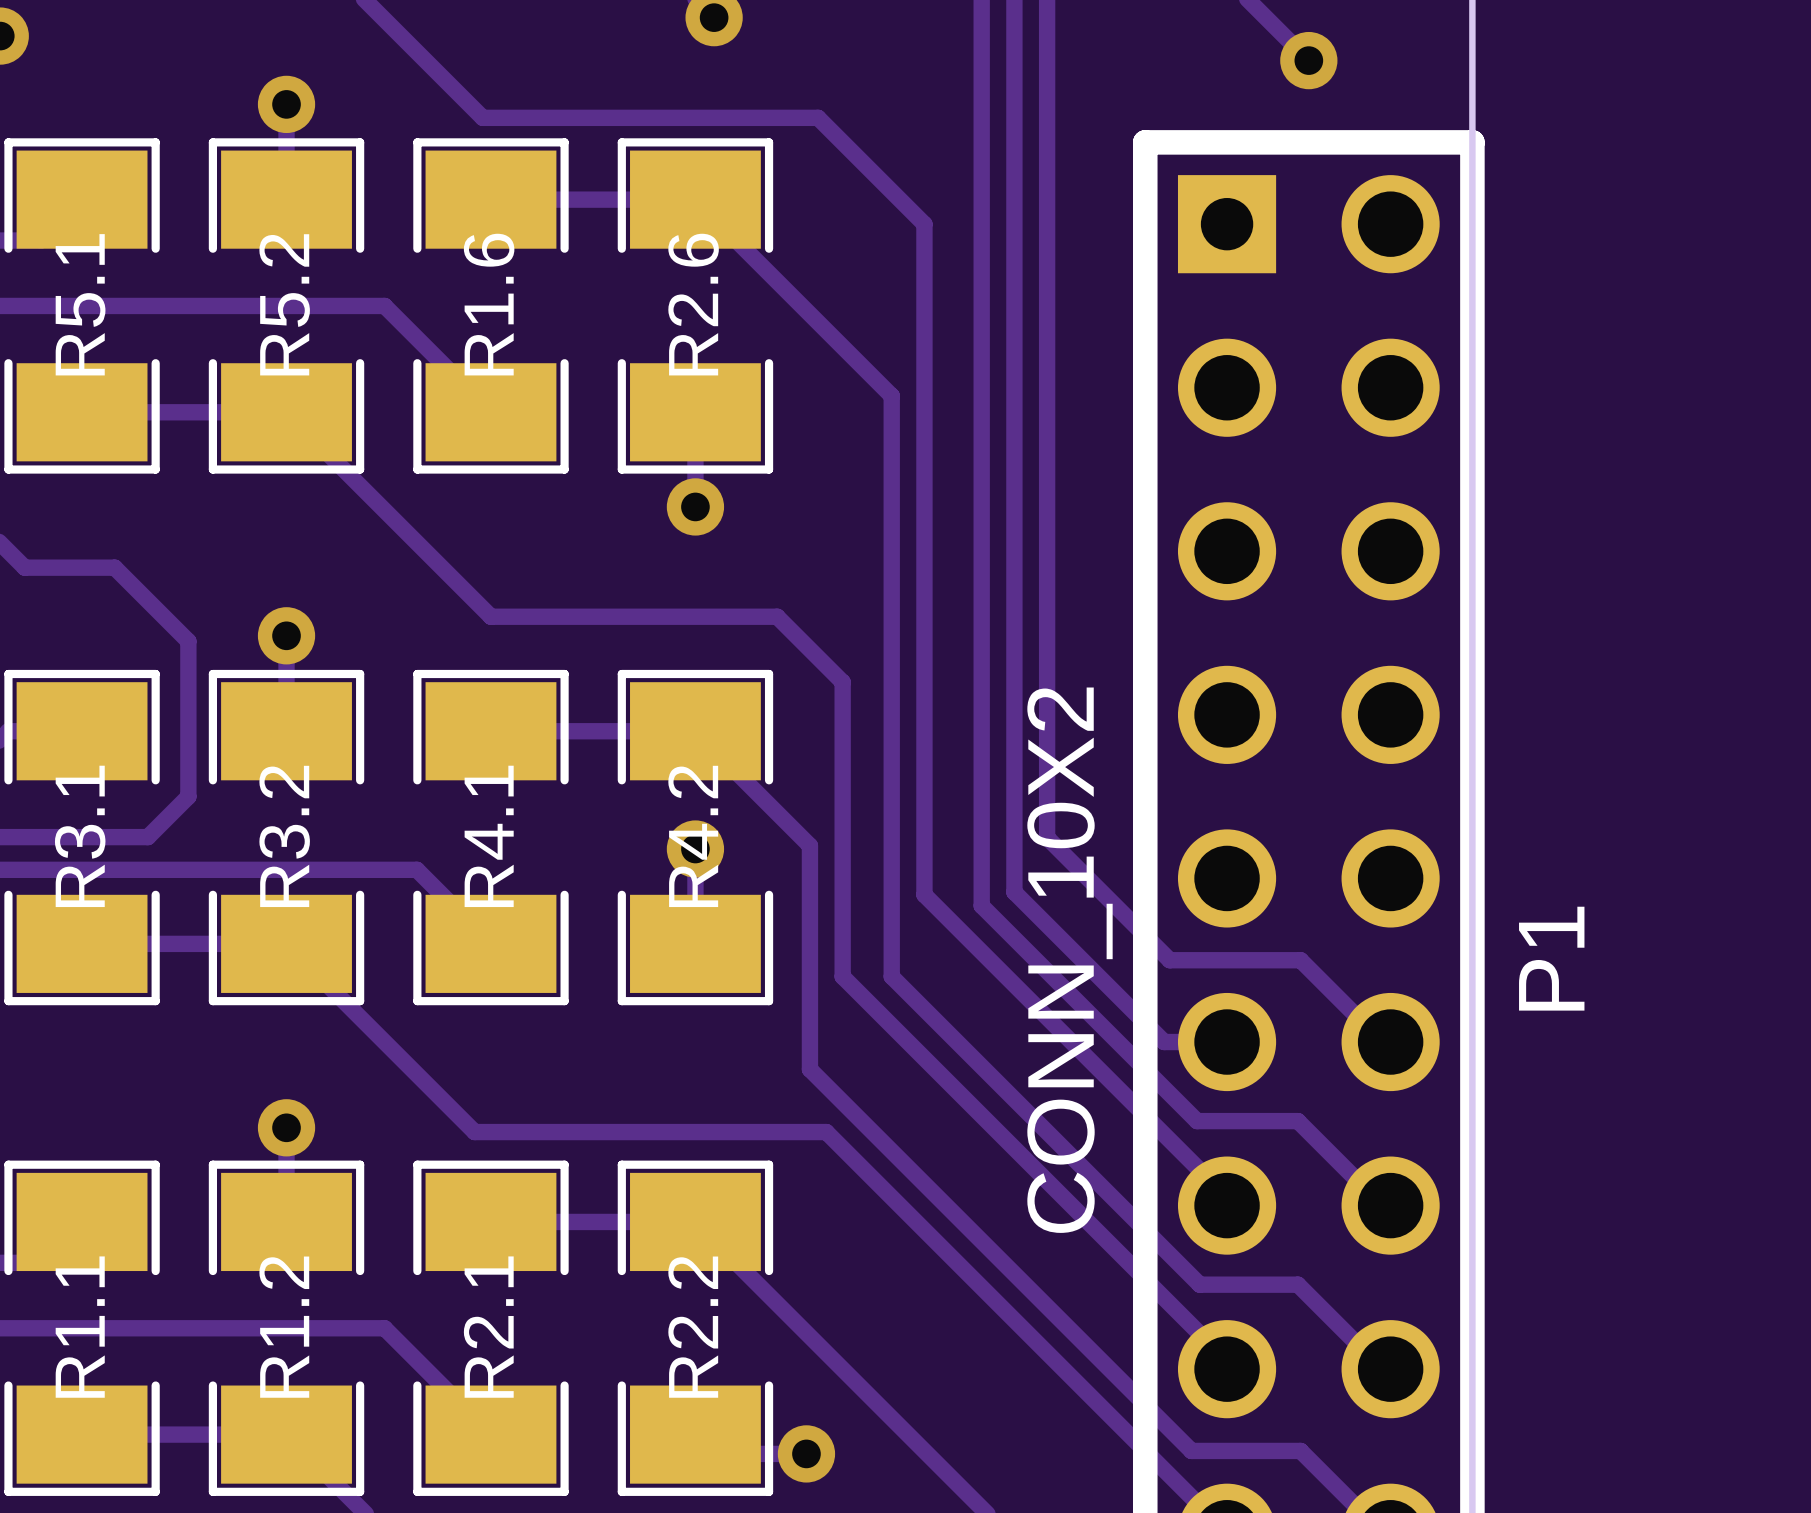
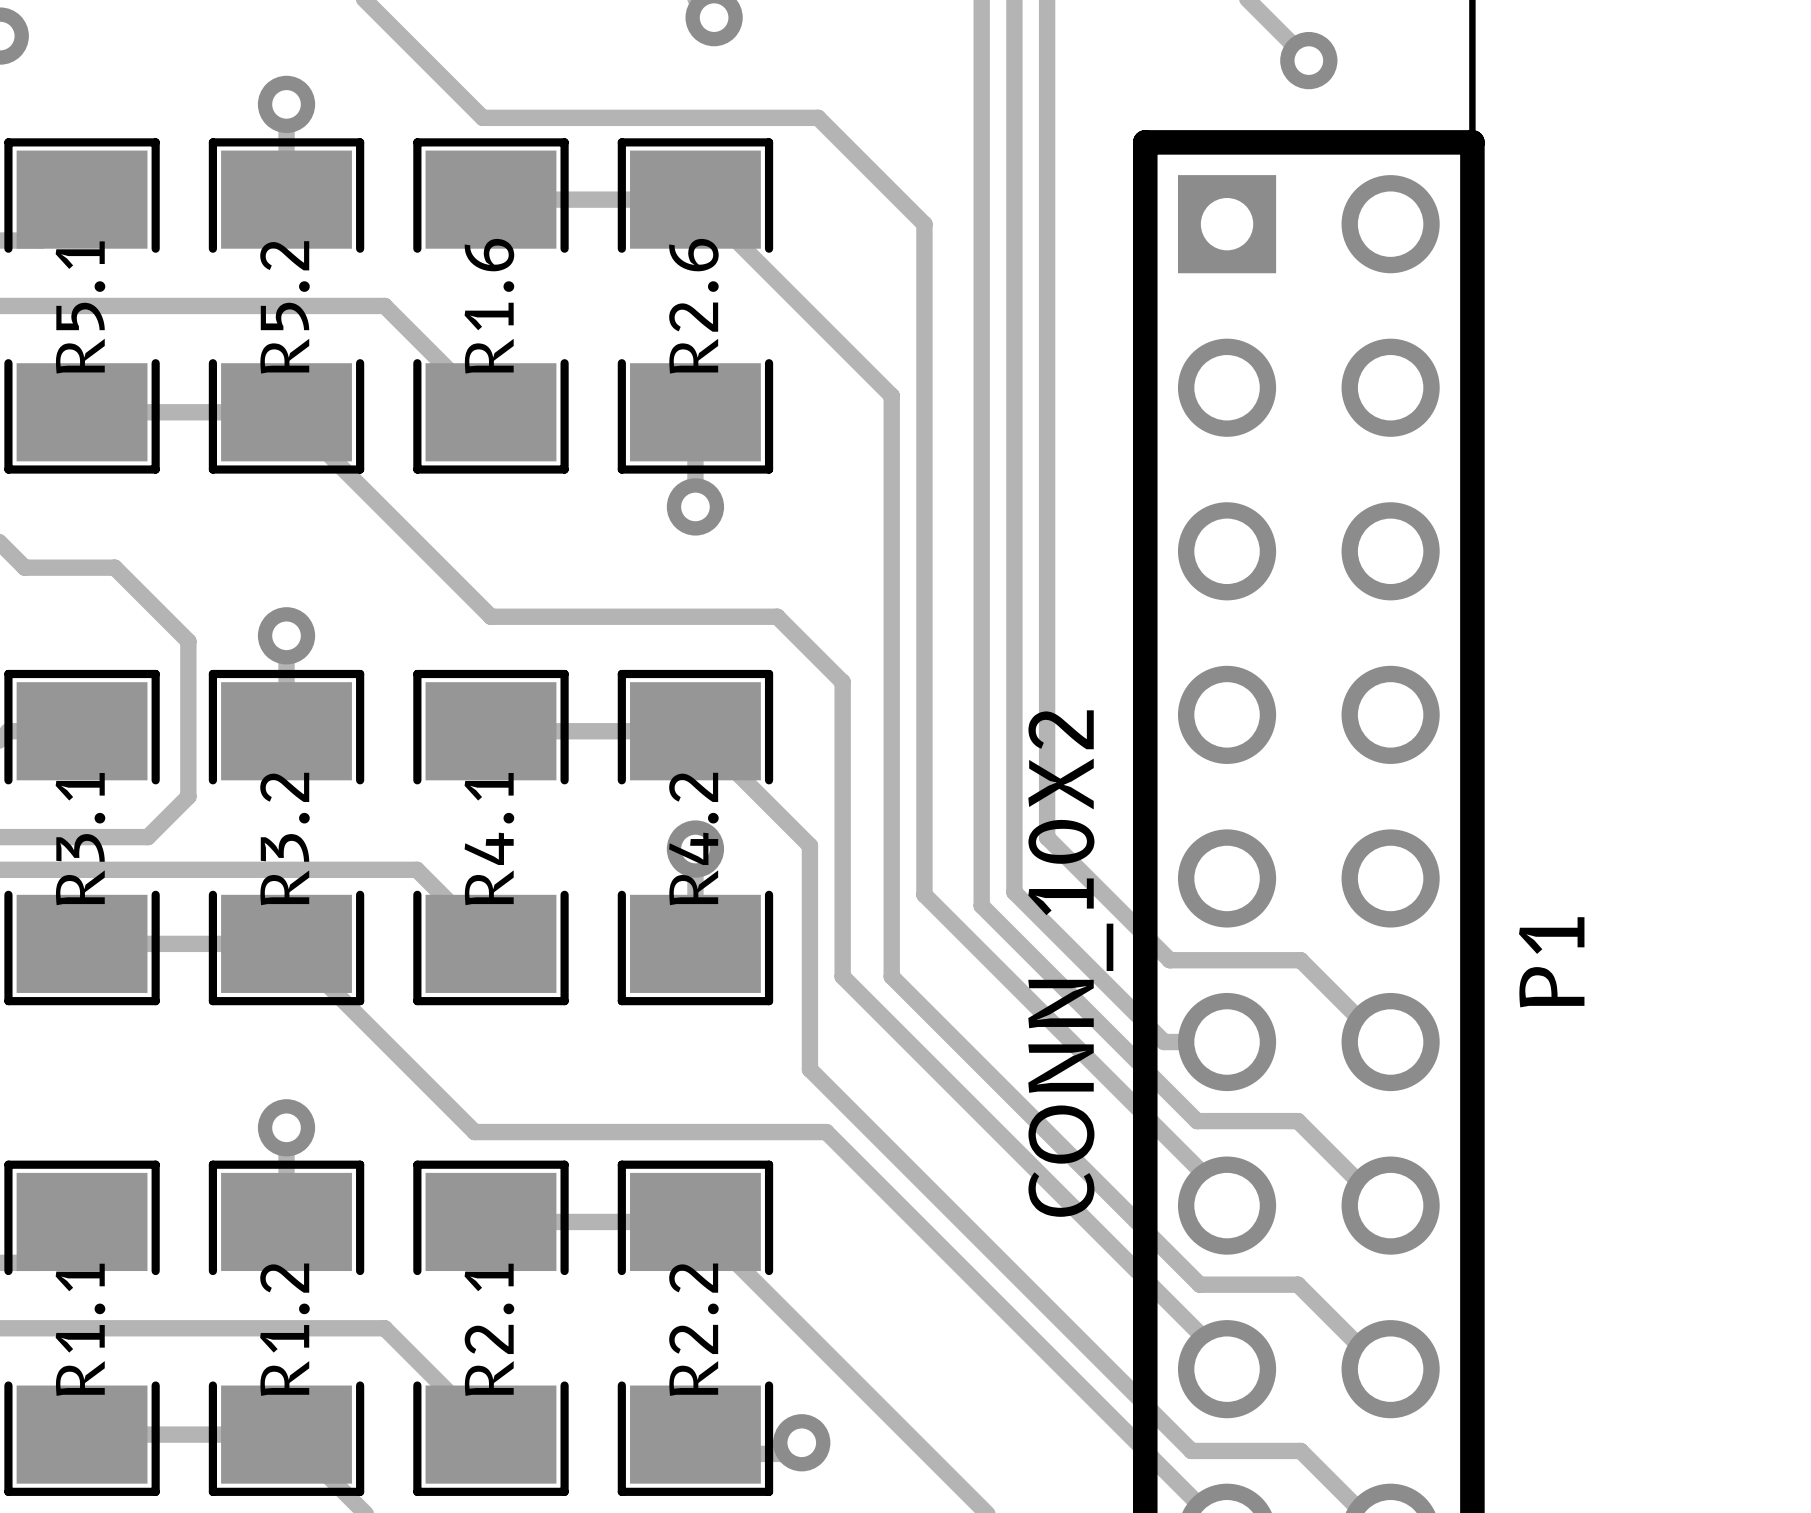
via position: (806, 1453) -> (801, 1442)

